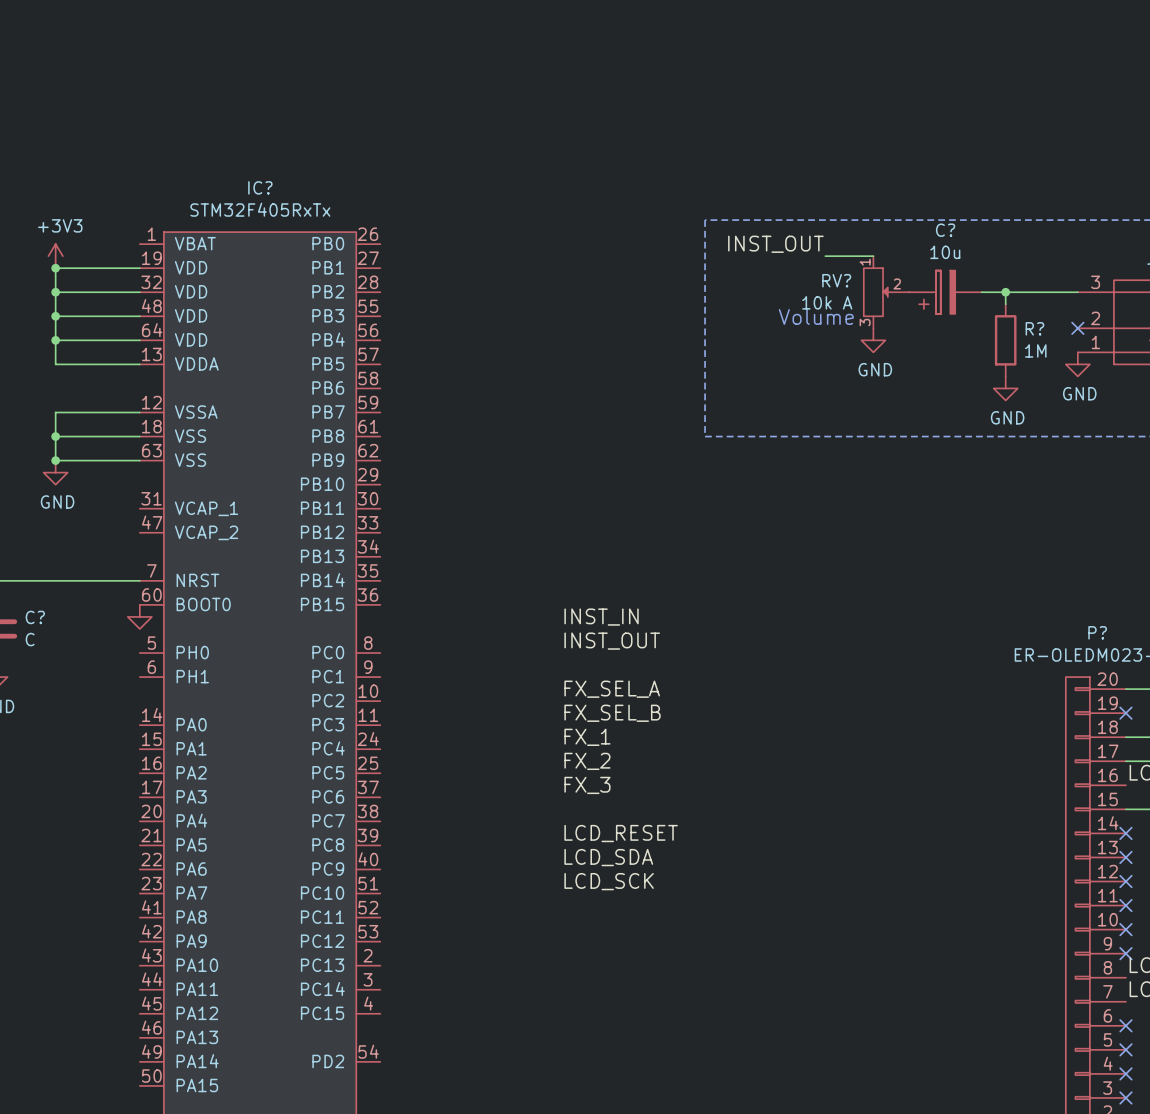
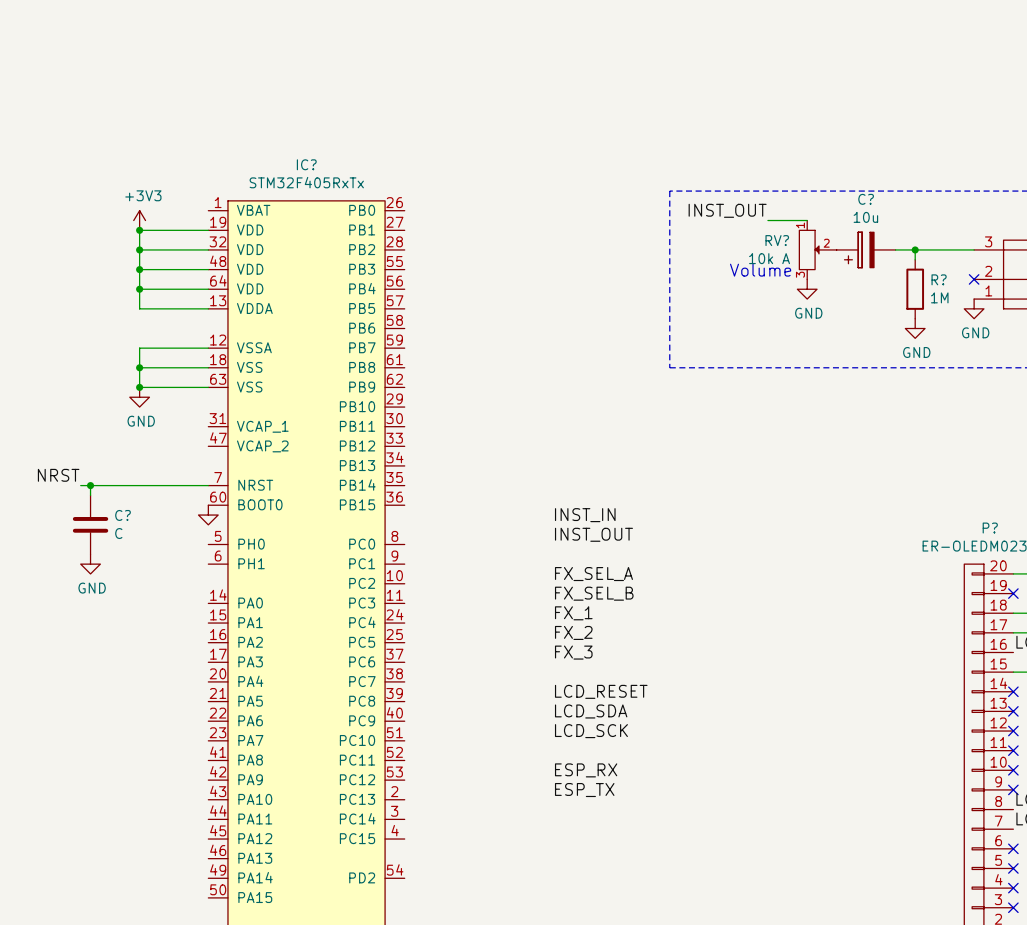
label: none -> ESP_RX (586, 770)
label: none -> ESP_TX (584, 790)

